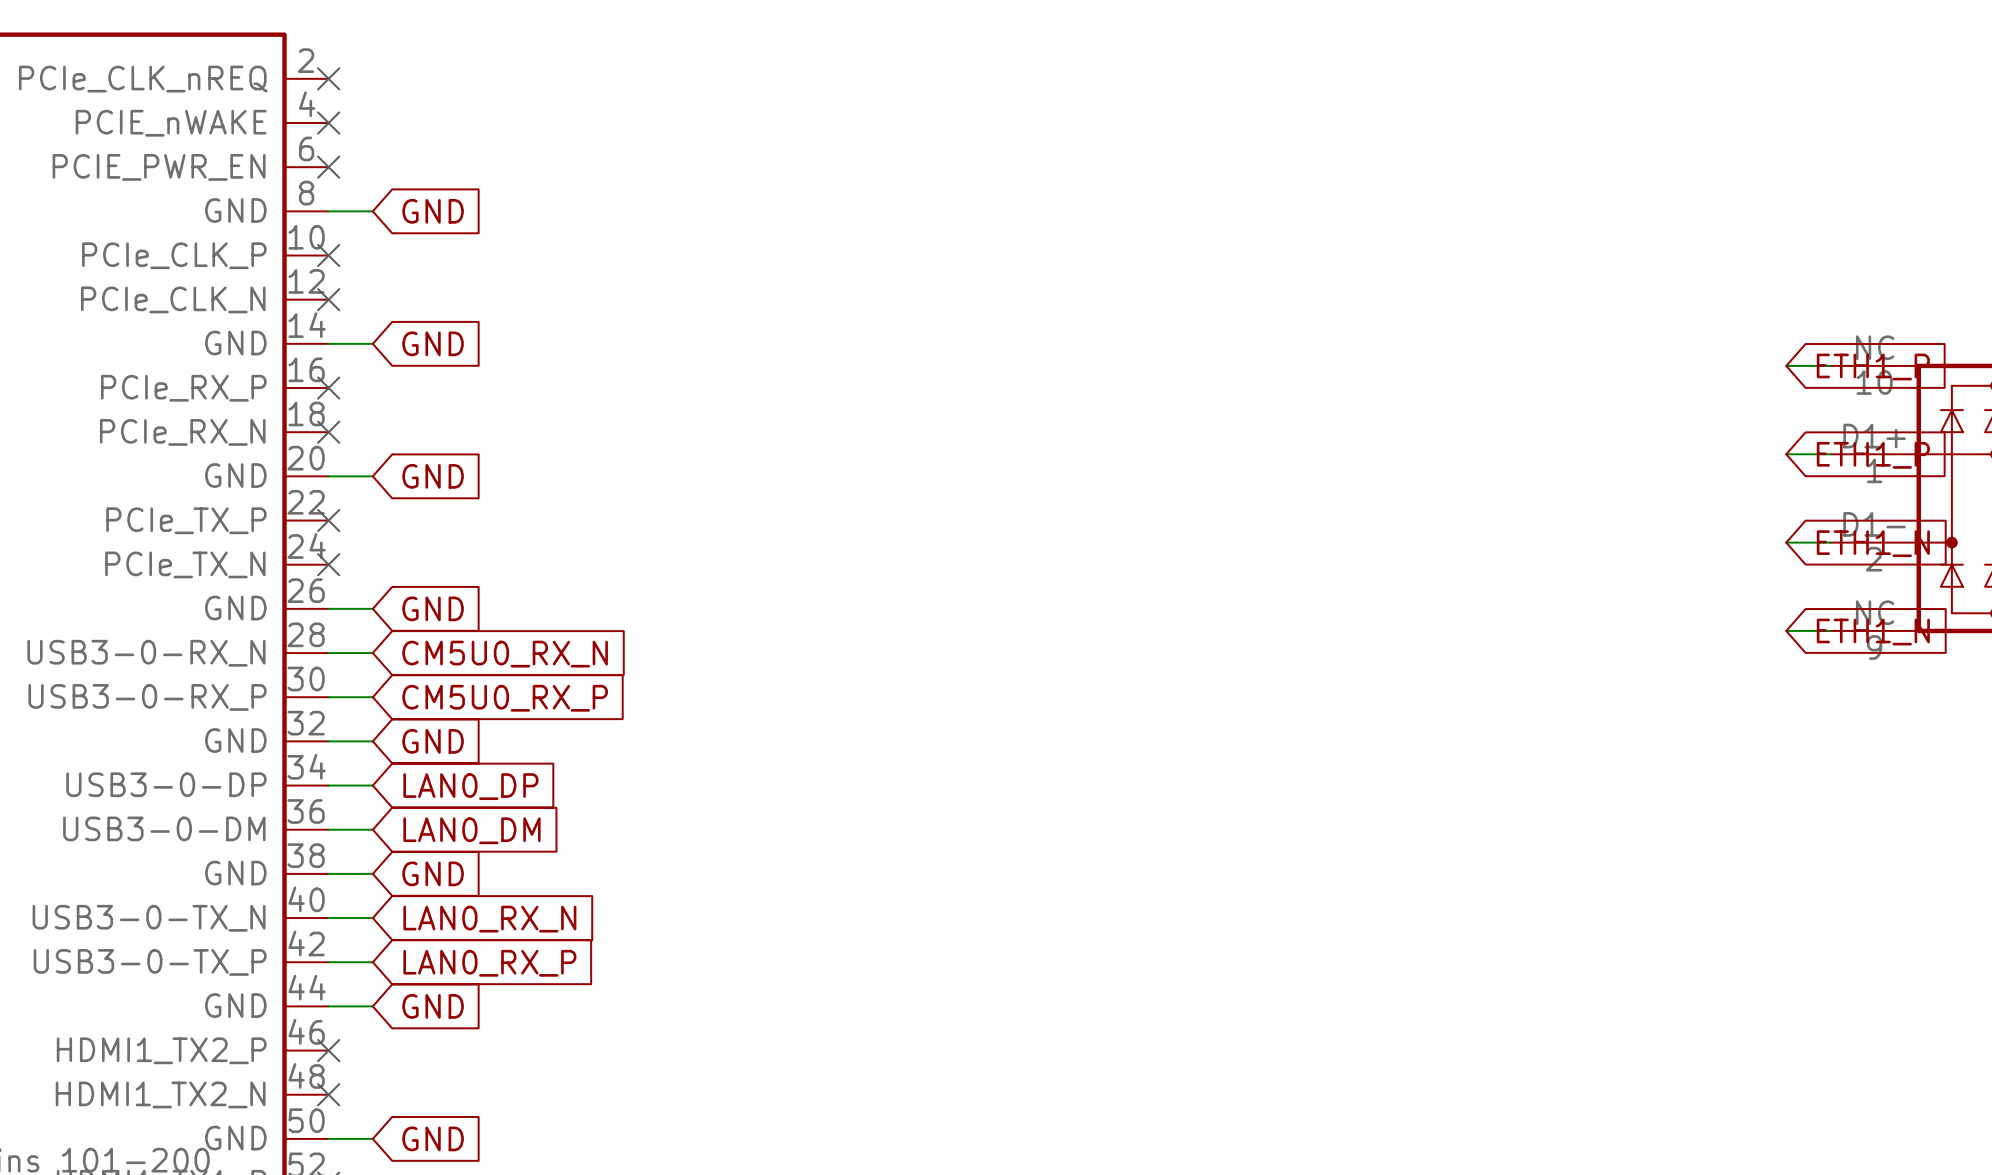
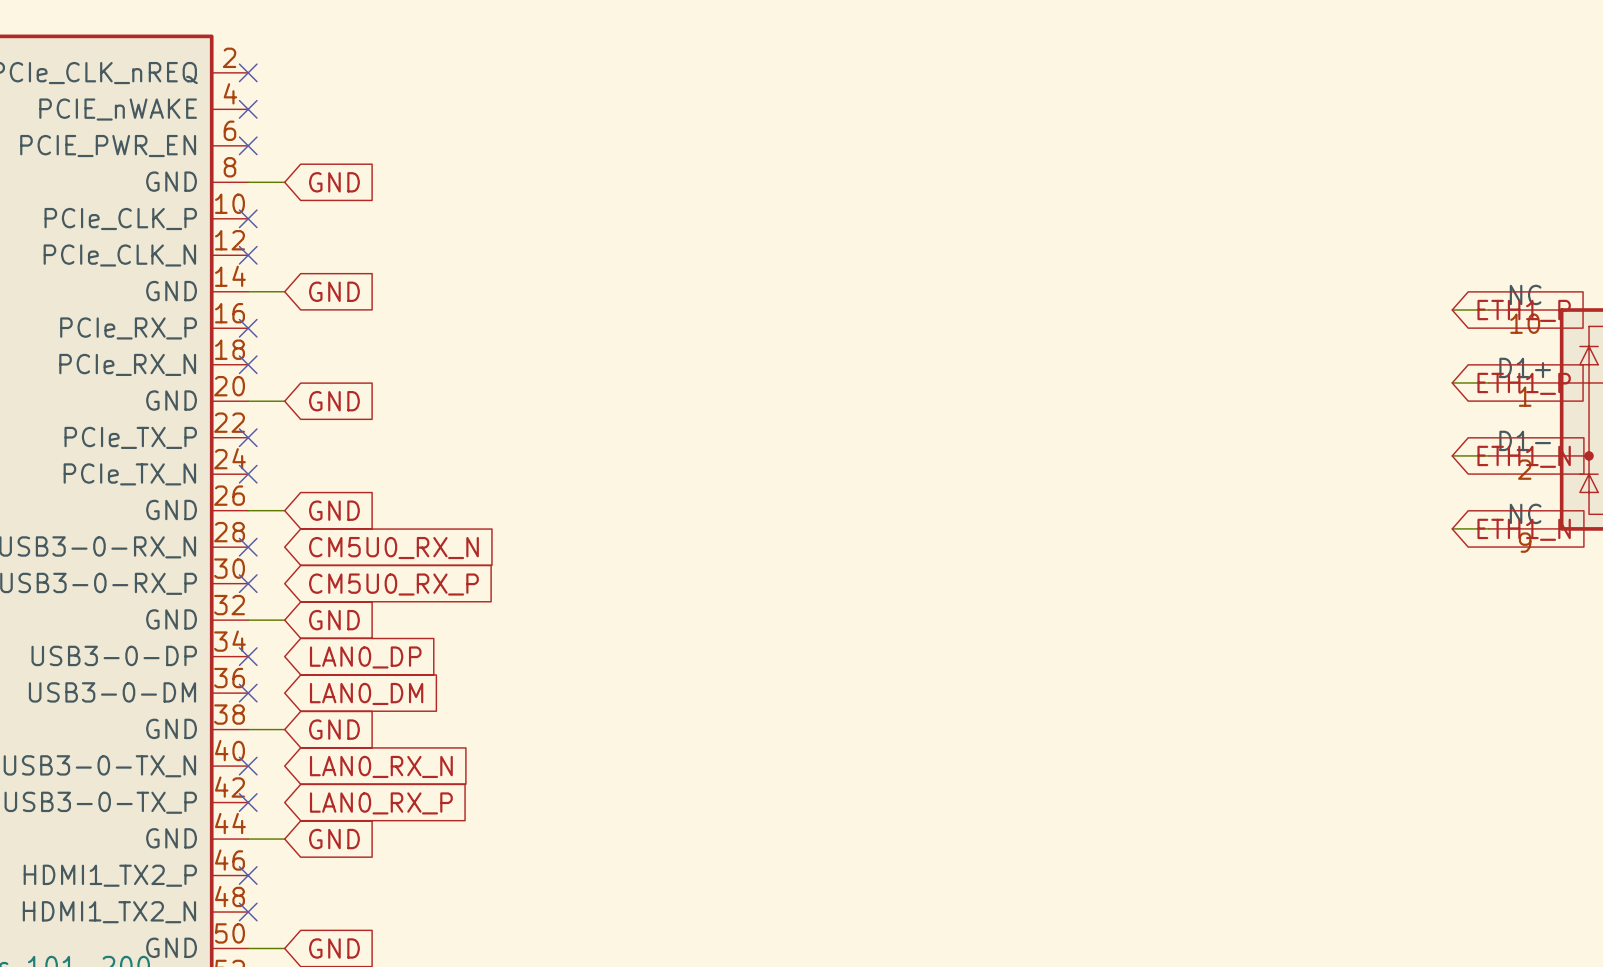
wire: (328, 653) (372, 653) -> none
no-connect mark: none -> (248, 547)
wire: (328, 697) (372, 697) -> none
no-connect mark: none -> (248, 583)
wire: (328, 785) (372, 785) -> none
no-connect mark: none -> (248, 656)
wire: (328, 829) (372, 829) -> none
no-connect mark: none -> (248, 693)
wire: (328, 918) (372, 918) -> none
no-connect mark: none -> (248, 766)
wire: (328, 962) (372, 962) -> none
no-connect mark: none -> (248, 802)

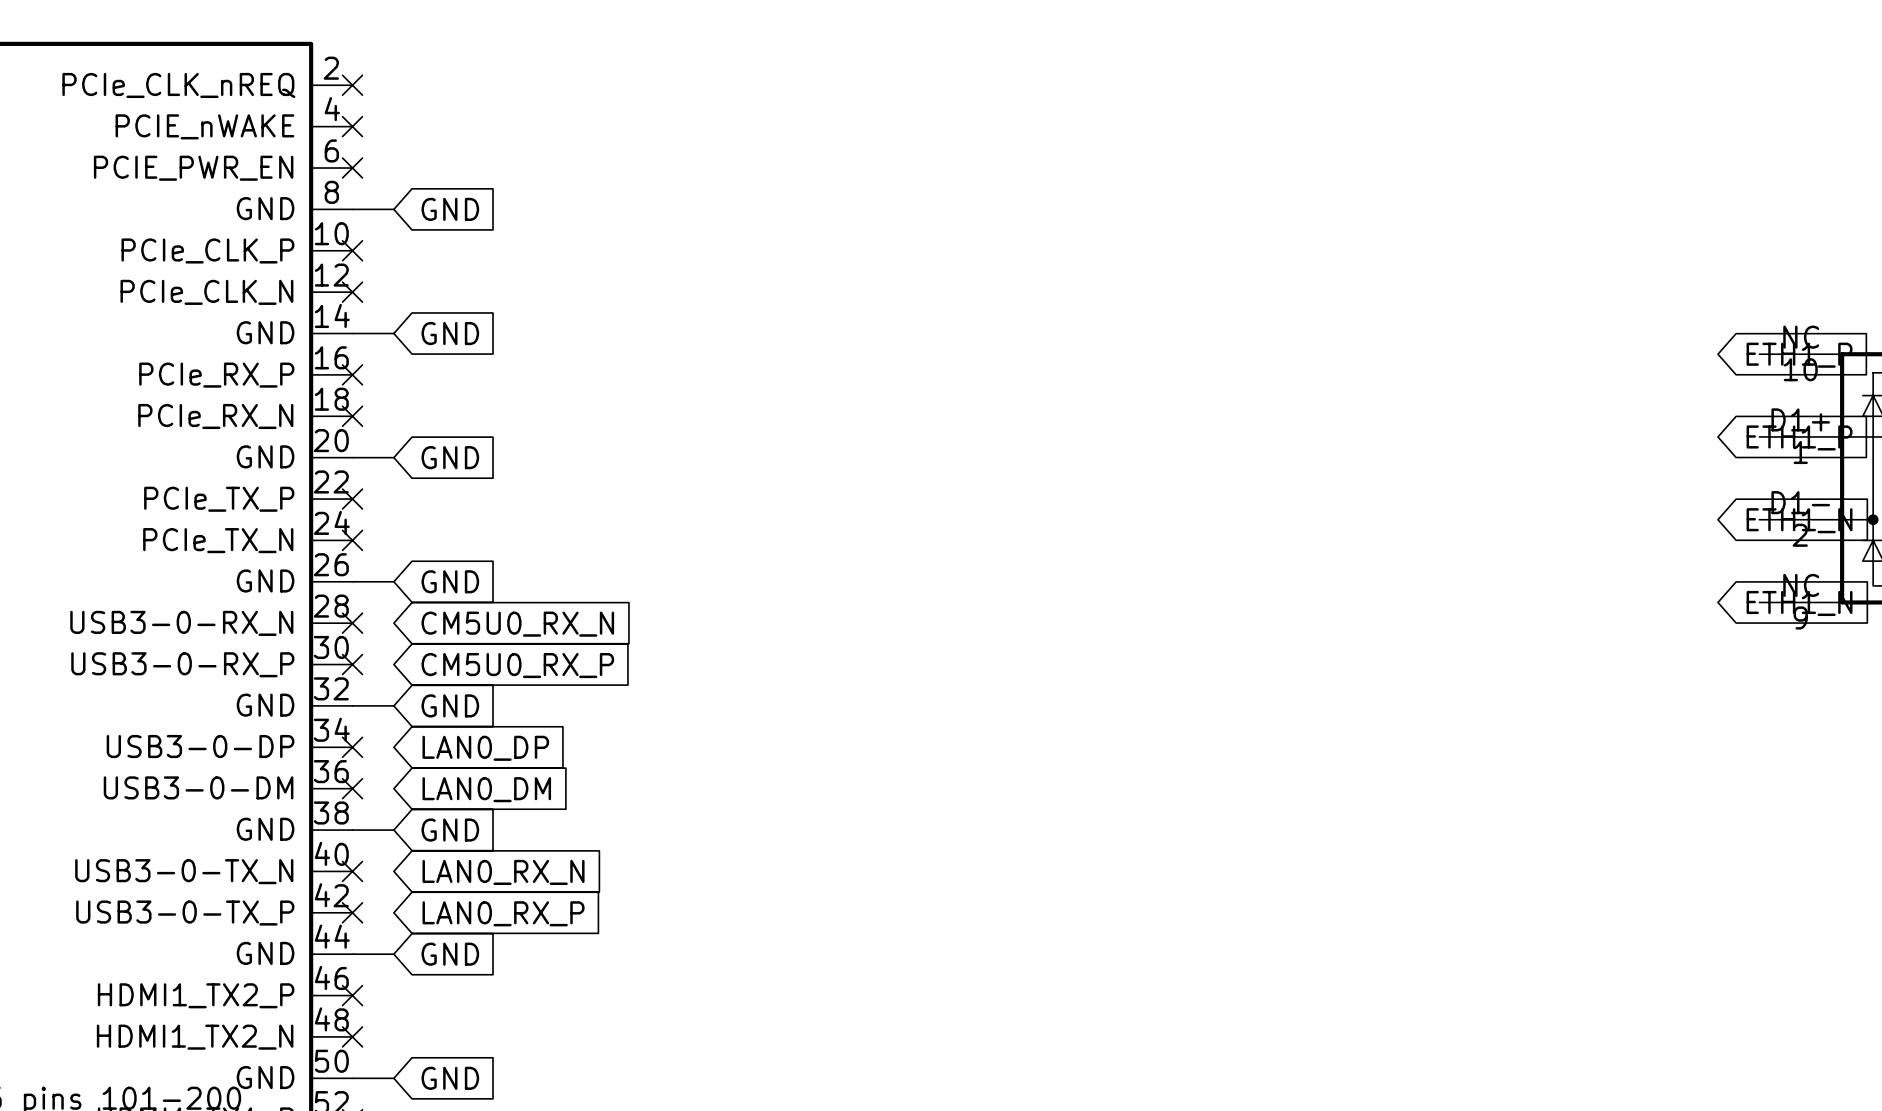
wire: (1452, 310) (1488, 310) -> none
wire: (1452, 382) (1488, 382) -> none
wire: (1452, 455) (1488, 455) -> none
wire: (1452, 528) (1488, 528) -> none

